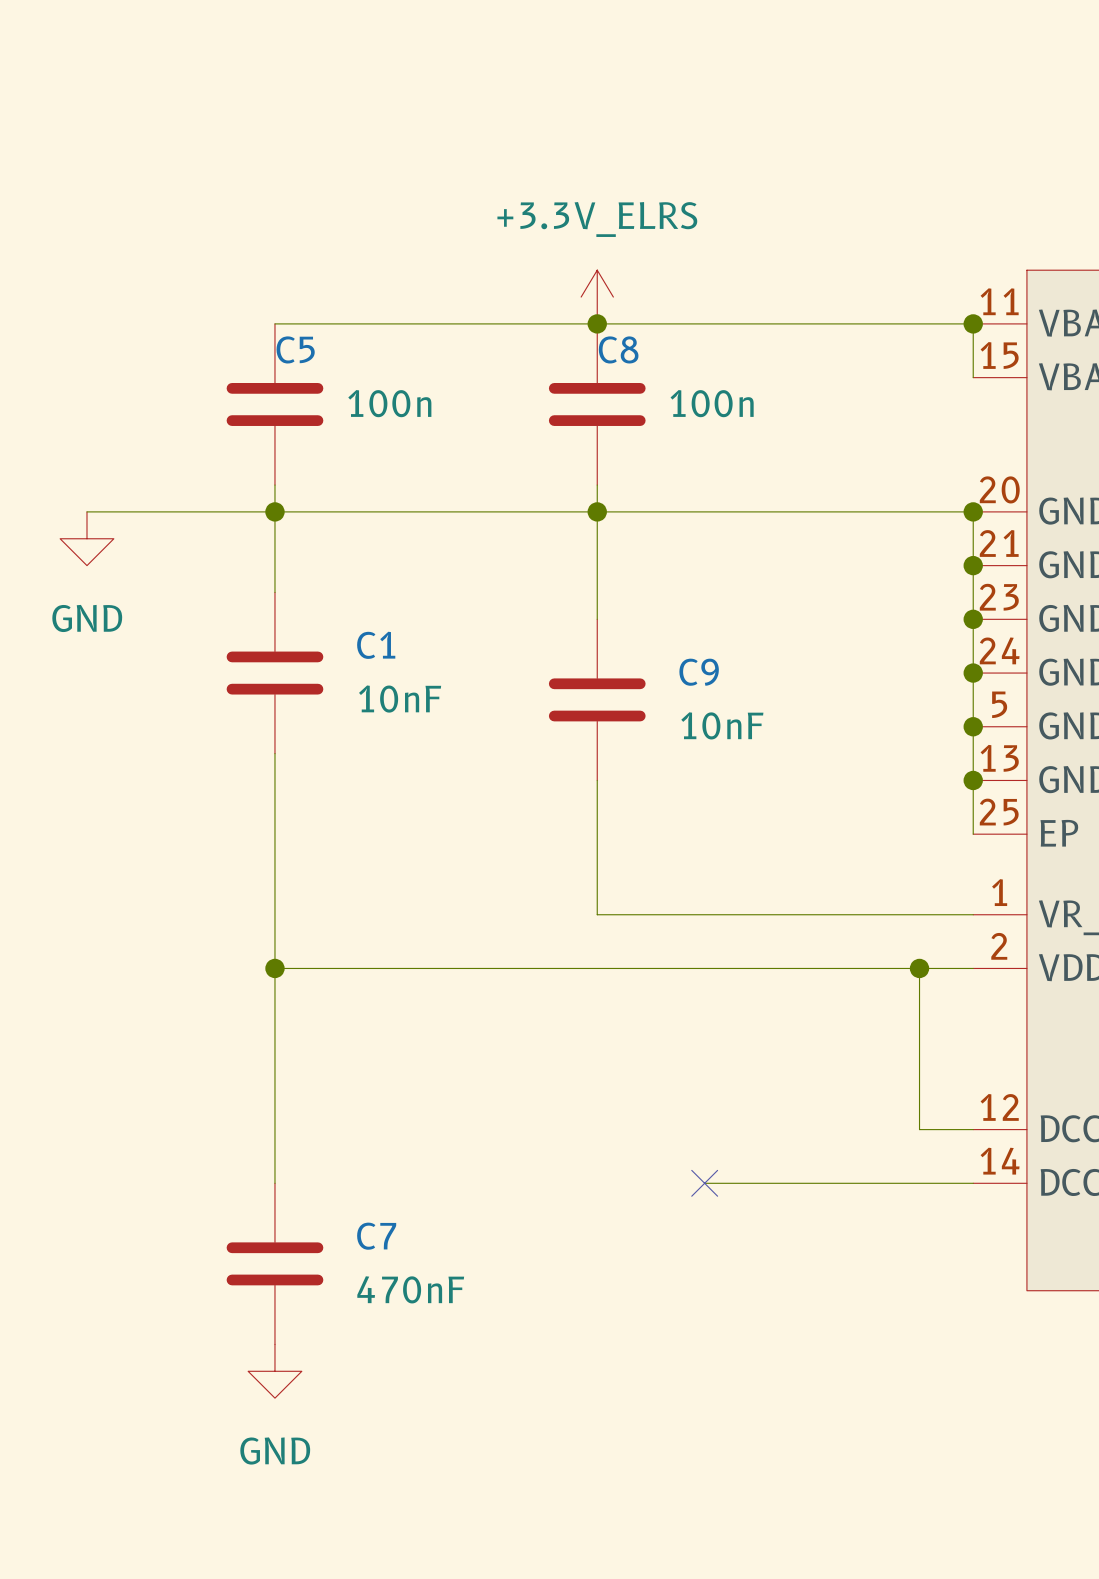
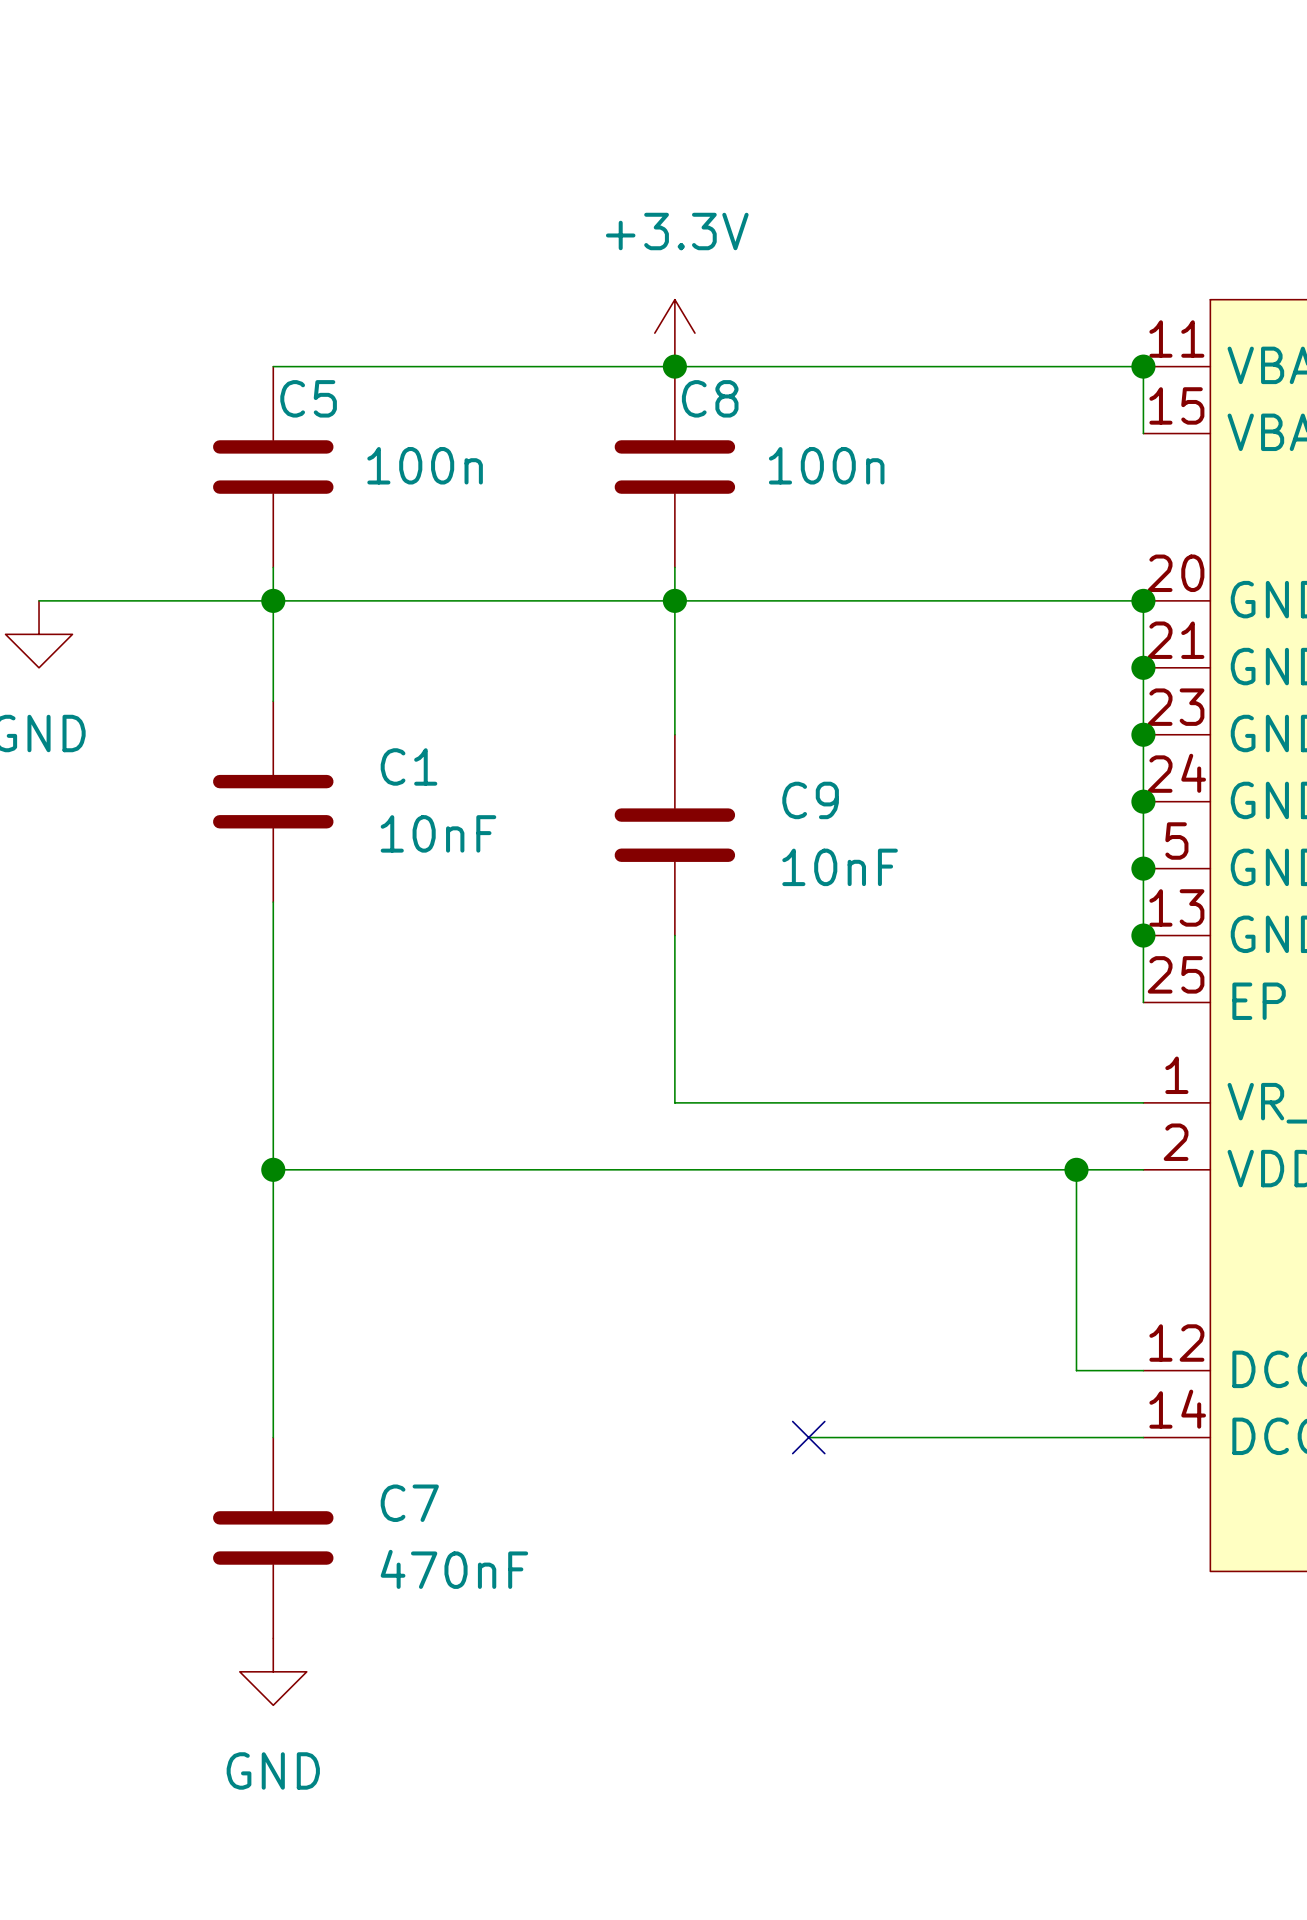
power symbol: +3.3V_ELRS (597, 297) -> +3.3V (674, 333)

